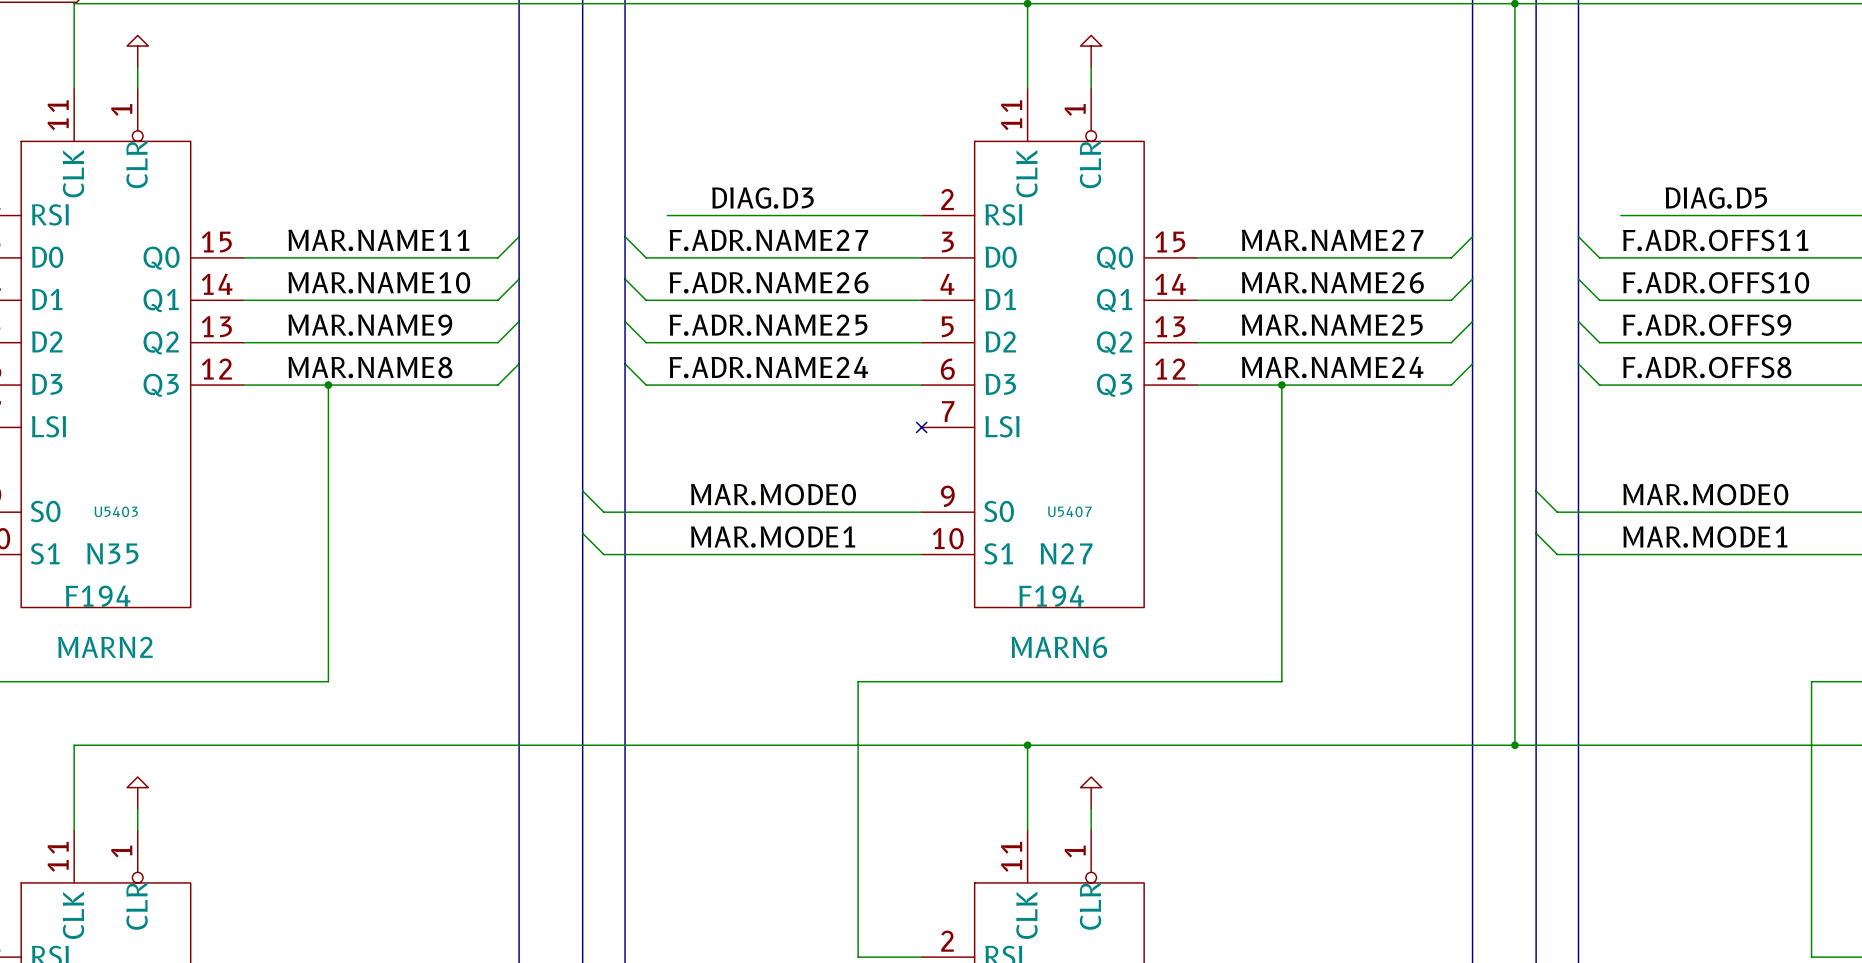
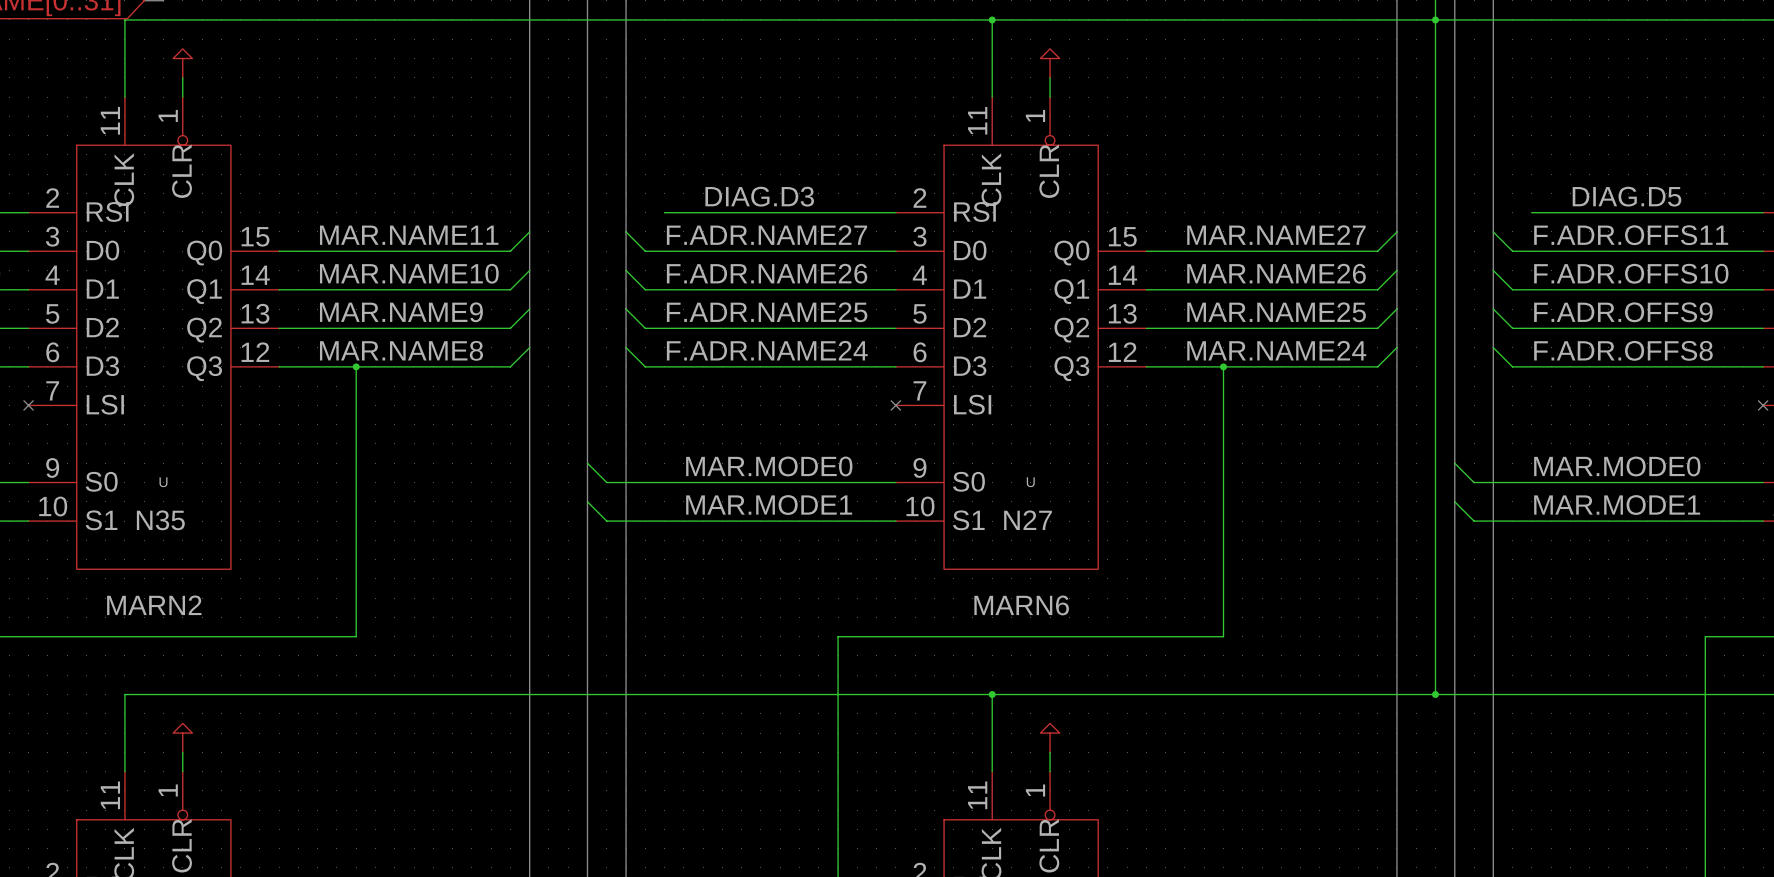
U5403 name: U5403 (116, 511) -> U (163, 482)
U5407 name: U5407 (1069, 511) -> U (1030, 482)
U5403 value: F194 (98, 596) -> none
U5407 value: F194 (1051, 596) -> none

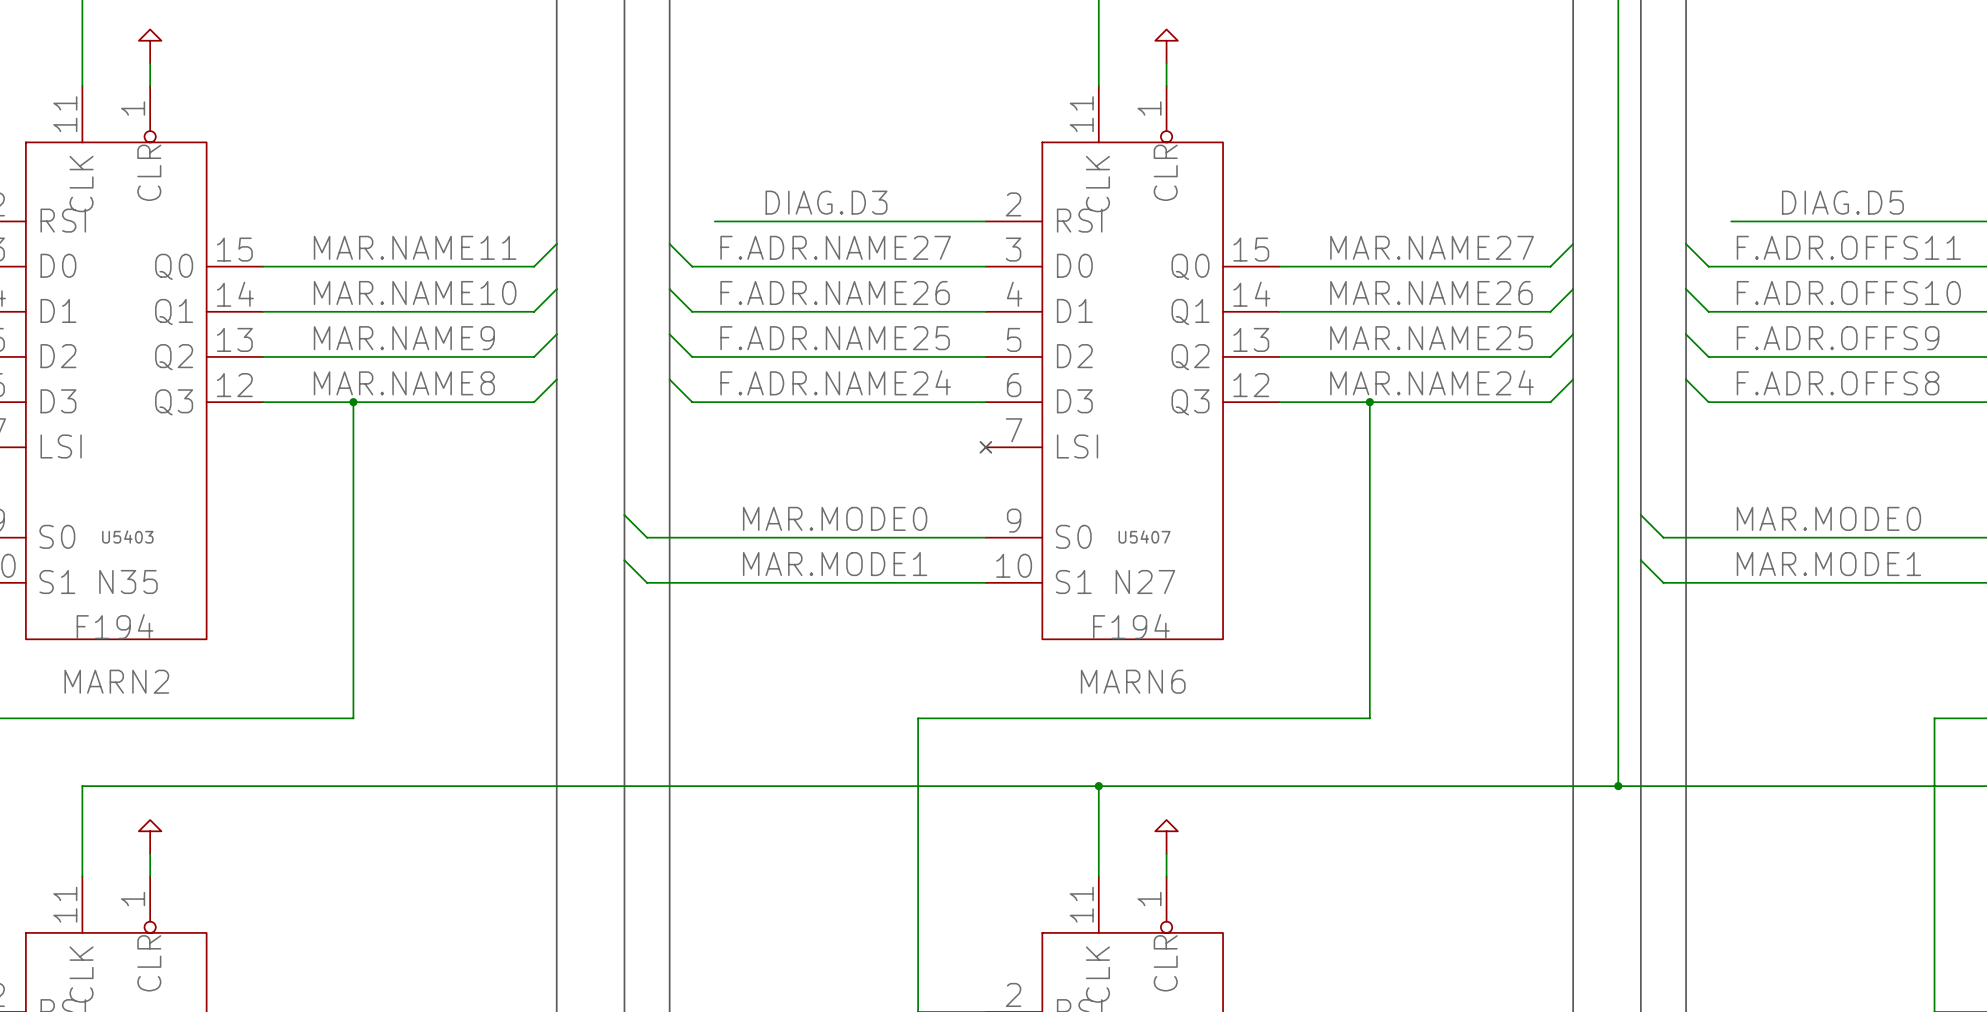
U name: U (163, 482) -> U5403 (127, 536)
U name: U (1030, 482) -> U5407 (1144, 536)
U value: none -> F194 (115, 626)
U value: none -> F194 (1131, 626)

